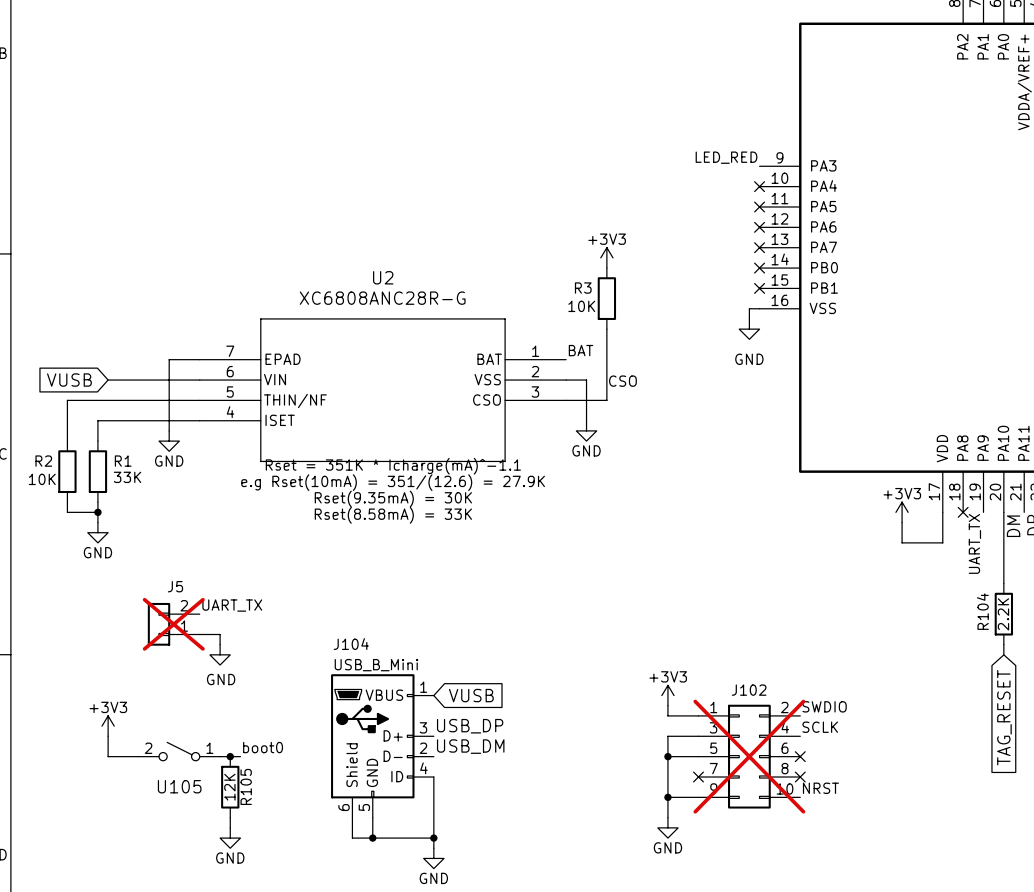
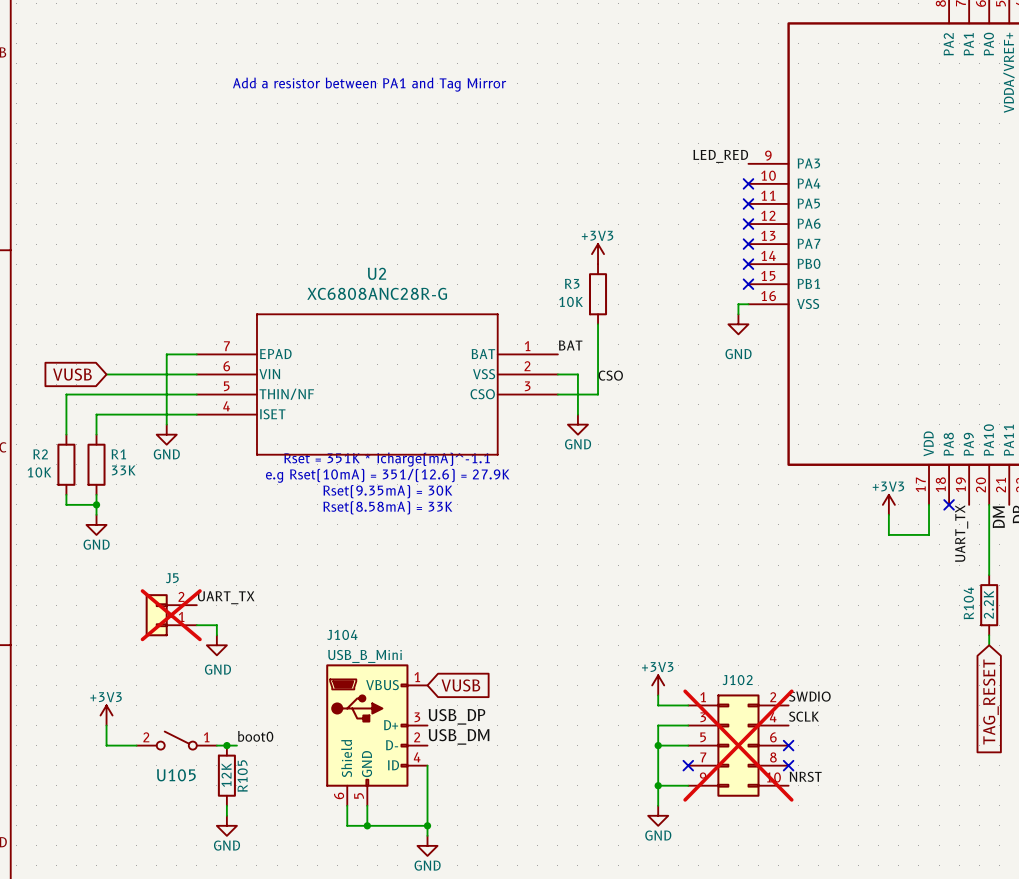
text: none -> Add a resistor between PA1 and Tag Mirror (369, 84)

